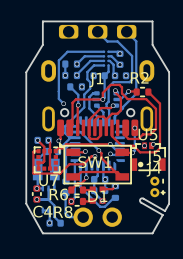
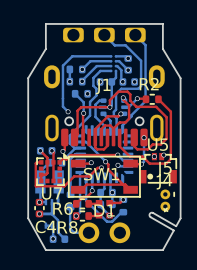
line: (163, 190) (163, 194) -> none
line: (161, 192) (164, 192) -> none
line: none -> (164, 209) (167, 211)
line: none -> (166, 208) (164, 211)

